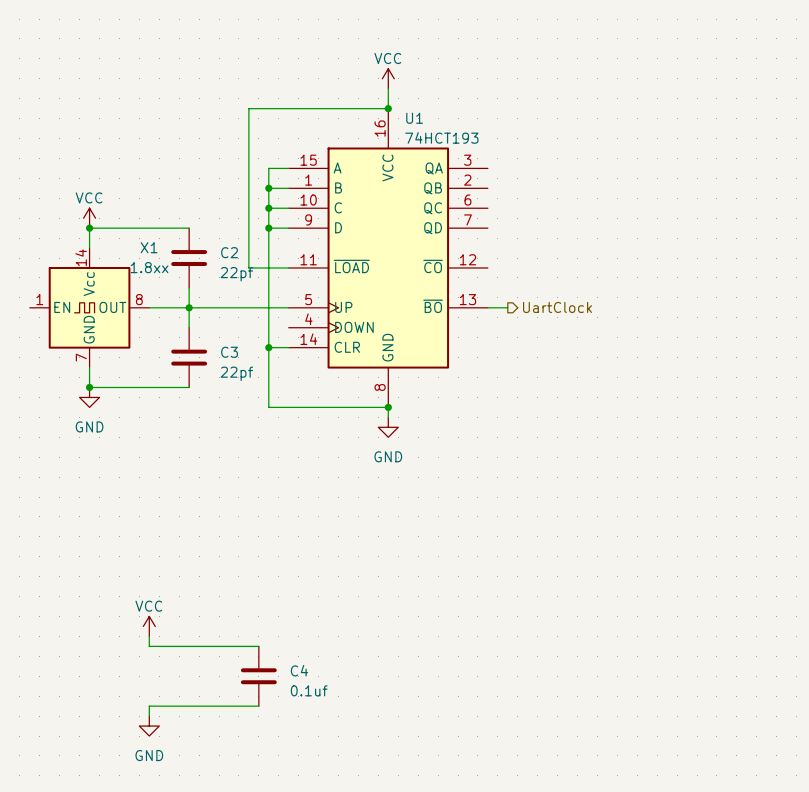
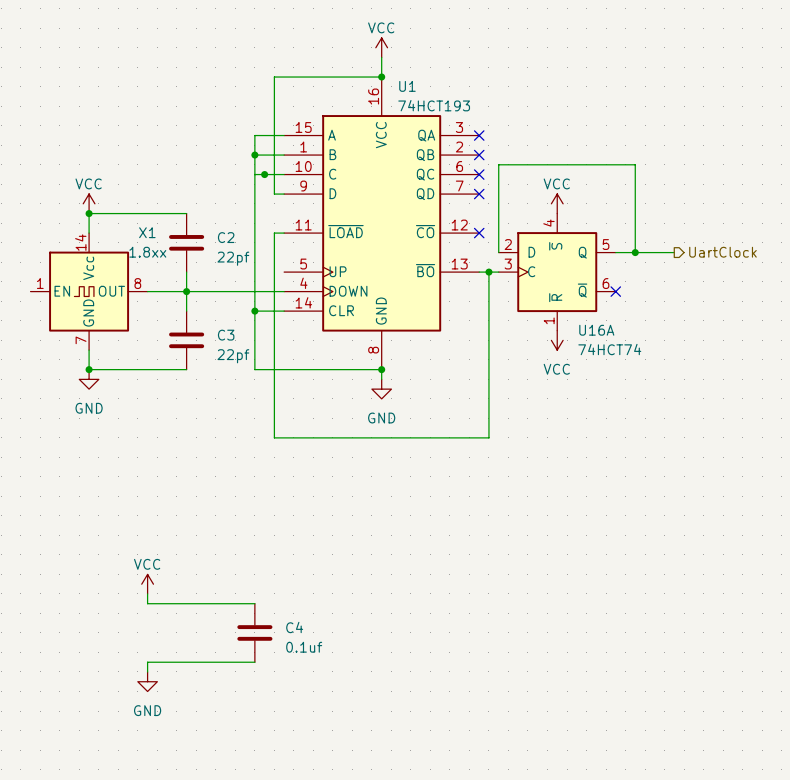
power symbol position: VCC (388, 78) -> VCC (381, 47)
wire: (388, 88) (388, 108) (248, 108) (248, 267) (288, 267) -> none
junction position: (388, 108) -> (381, 77)
wire: none -> (284, 135) (254, 135) (254, 369) (381, 369) (381, 379)
no-connect mark: none -> (479, 135)
junction: none -> (254, 155)
wire: (268, 168) (268, 407) (388, 407) (388, 417) -> (264, 155) (254, 155)
no-connect mark: none -> (479, 155)
wire: none -> (254, 174) (264, 174)
no-connect mark: none -> (479, 174)
wire: (268, 208) (278, 208) -> (381, 57) (381, 77) (274, 77) (274, 194)
junction: (268, 208) -> none
no-connect mark: none -> (479, 194)
power symbol: none -> VCC (557, 203)
wire: (268, 228) (288, 228) -> none
junction: (268, 228) -> none
wire: none -> (284, 233) (274, 233) (274, 437) (488, 437) (488, 272)
no-connect mark: none -> (479, 233)
U1 position: (388, 258) -> (381, 223)
wire: none -> (498, 252) (498, 164) (635, 164) (635, 252)
wire: none -> (615, 252) (674, 252)
junction: none -> (635, 252)
junction: none -> (488, 272)
U16A: none -> 74HCT74 (557, 272)
wire: (487, 307) (507, 307) -> (479, 272) (498, 272)
hierarchical label position: UartClock (557, 307) -> UartClock (722, 252)
no-connect mark: none -> (615, 291)
wire: none -> (254, 311) (284, 311)
wire: (268, 347) (288, 347) -> none
junction position: (268, 347) -> (254, 311)
power symbol: none -> VCC (557, 340)
junction position: (388, 407) -> (381, 369)
power symbol position: GND (388, 427) -> GND (381, 389)
power symbol position: VCC (149, 626) -> VCC (147, 584)
wire: (149, 636) (149, 646) (258, 646) -> (147, 593) (147, 603) (254, 603)
C4 position: (258, 676) -> (254, 632)
wire: (258, 706) (149, 706) (149, 716) -> (254, 662) (147, 662) (147, 671)
power symbol position: GND (149, 726) -> GND (147, 681)

